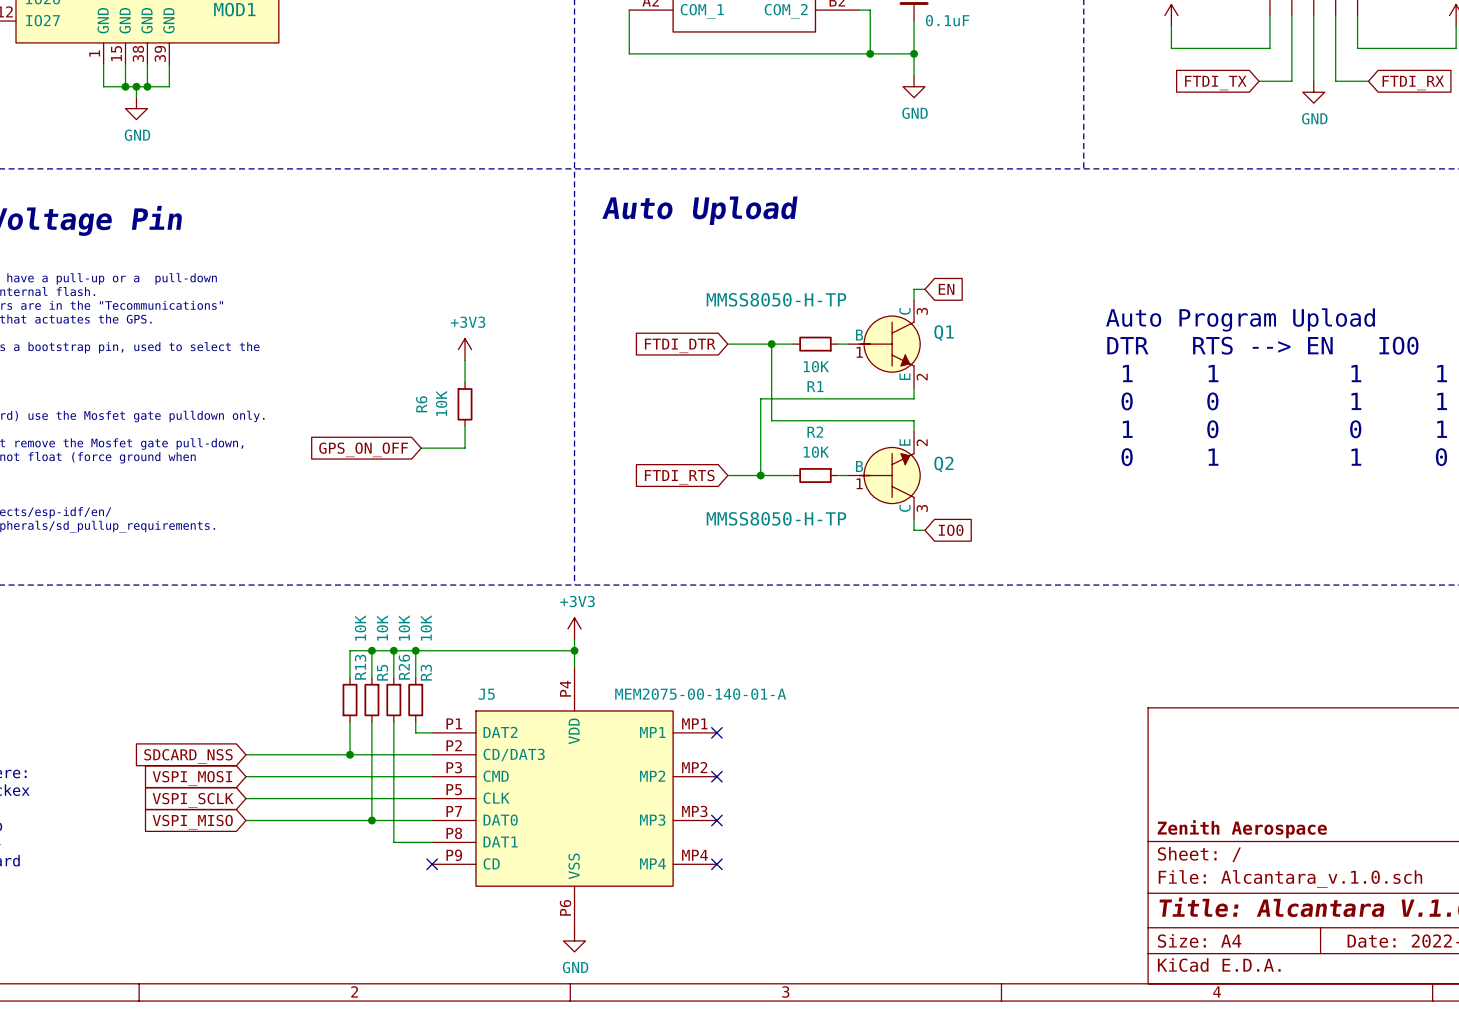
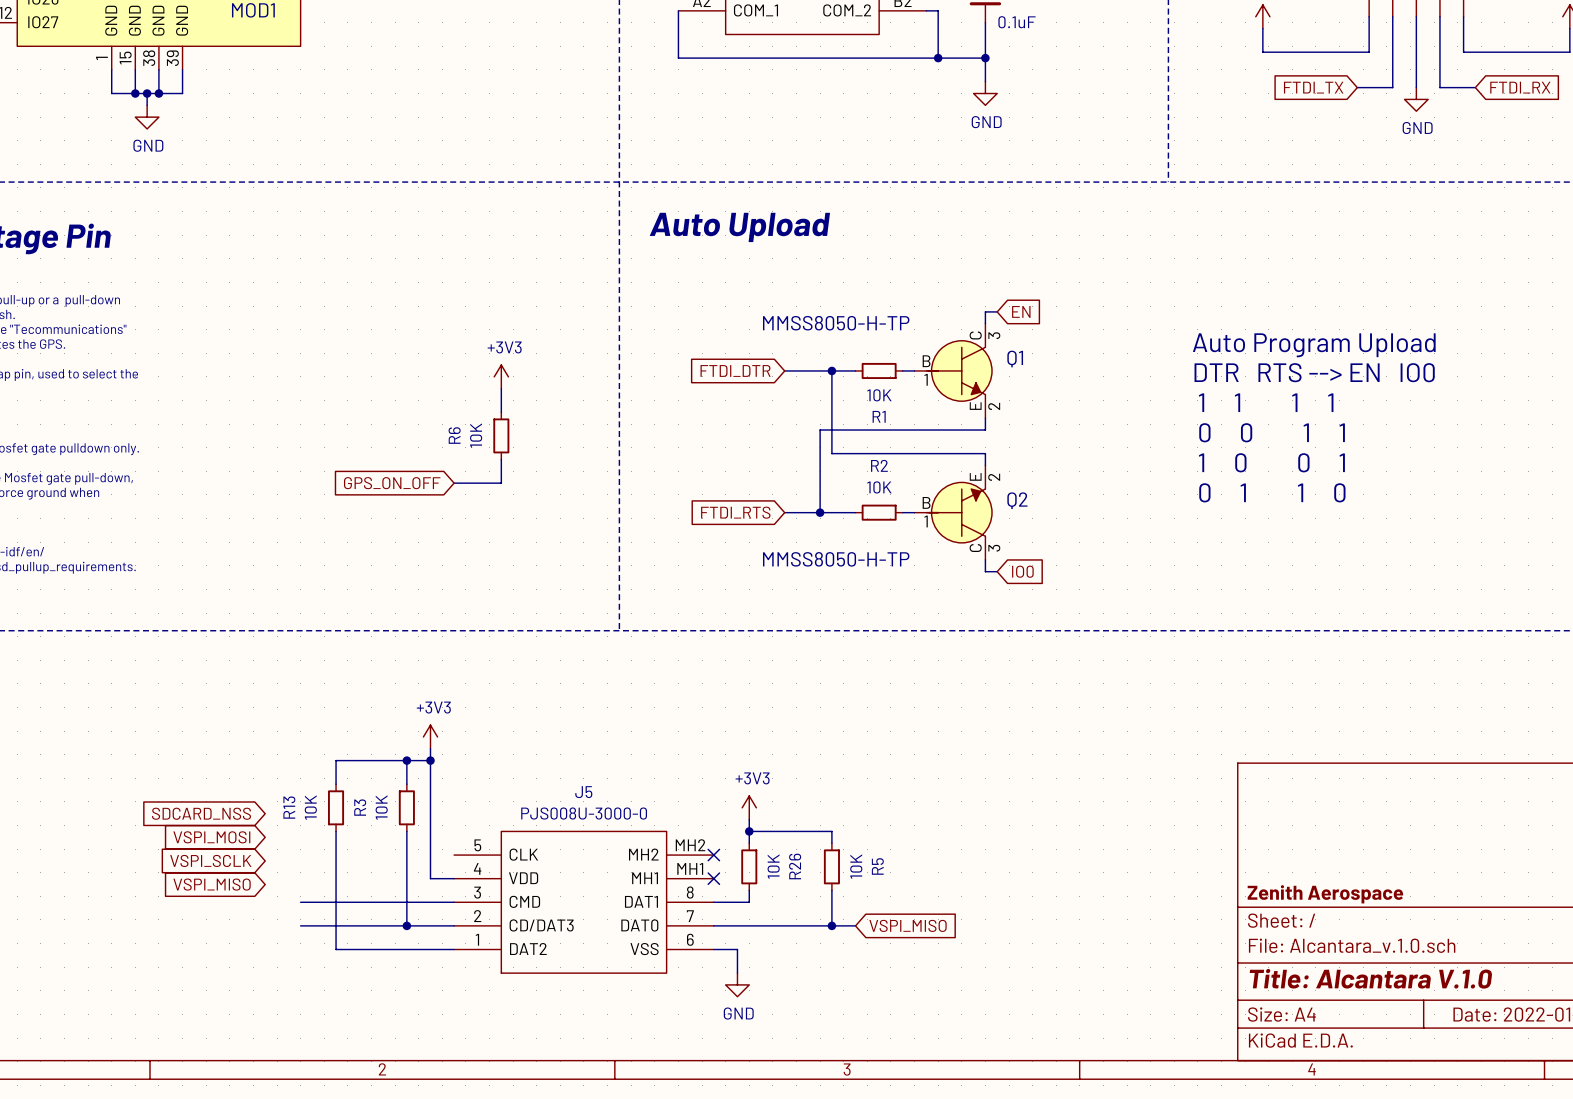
R13 value position: 10K (360, 627) -> 10K (310, 807)
R5 value position: 10K (382, 627) -> 10K (856, 866)
R26 value position: 10K (404, 627) -> 10K (773, 866)
R3 value position: 10K (426, 627) -> 10K (381, 807)
power symbol: +3V3 (574, 628) -> none
wire: (574, 639) (574, 667) -> none
wire: (371, 650) (371, 678) -> none
junction: (371, 650) -> none
wire: (393, 650) (393, 678) -> none
junction: (393, 650) -> none
wire: (415, 650) (415, 678) -> none
junction: (415, 650) -> none
wire: (574, 650) (350, 650) (350, 678) -> none
junction: (574, 650) -> none
R13 name position: R13 (360, 667) -> R13 (289, 807)
R26 name position: R26 (404, 667) -> R26 (795, 866)
J5 symbol: [432, 667, 717, 931] -> [454, 830, 714, 974]
R5 name position: R5 (382, 672) -> R5 (877, 866)
R3 name position: R3 (426, 672) -> R3 (360, 807)
power symbol: none -> +3V3 (430, 736)
wire: none -> (430, 748) (430, 878) (454, 878)
J5 name position: J5 (486, 694) -> J5 (583, 792)
J5 value: MEM2075-00-140-01-A (700, 694) -> PJS008U-3000-0 (584, 813)
R13 position: (350, 700) -> (336, 807)
R5 position: (371, 700) -> (831, 866)
R26 position: (393, 700) -> (749, 866)
R3 position: (415, 700) -> (406, 807)
wire: none -> (406, 760) (406, 784)
junction: none -> (406, 760)
wire: none -> (430, 760) (336, 760) (336, 784)
junction: none -> (430, 760)
wire: (350, 721) (350, 754) -> none
wire: (371, 721) (371, 820) -> none
wire: (393, 721) (393, 842) (432, 842) -> none
wire: (415, 721) (415, 732) (432, 732) -> none
no-connect mark: (716, 732) -> none
power symbol: none -> +3V3 (749, 807)
wire: (245, 754) (432, 754) -> none
junction: (350, 754) -> none
wire: none -> (749, 819) (749, 843)
wire: none -> (336, 831) (336, 949) (454, 949)
wire: none -> (406, 831) (406, 925)
wire: none -> (749, 831) (831, 831) (831, 843)
junction: none -> (749, 831)
wire: (245, 776) (432, 776) -> none
no-connect mark: (716, 776) -> none
no-connect mark: none -> (713, 855)
wire: (245, 798) (432, 798) -> none
no-connect mark: none -> (713, 878)
wire: (245, 820) (432, 820) -> none
junction position: (371, 820) -> (406, 925)
no-connect mark: (716, 820) -> none
wire: none -> (749, 890) (749, 902) (713, 902)
wire: none -> (831, 890) (831, 925)
wire: none -> (300, 902) (454, 902)
wire: none -> (300, 925) (454, 925)
wire: none -> (713, 925) (855, 925)
junction: none -> (831, 925)
global label: none -> VSPI_MISO (908, 925)
no-connect mark: (432, 864) -> none
no-connect mark: (716, 864) -> none
wire: none -> (713, 949) (737, 949) (737, 973)
power symbol position: GND (574, 940) -> GND (737, 984)

